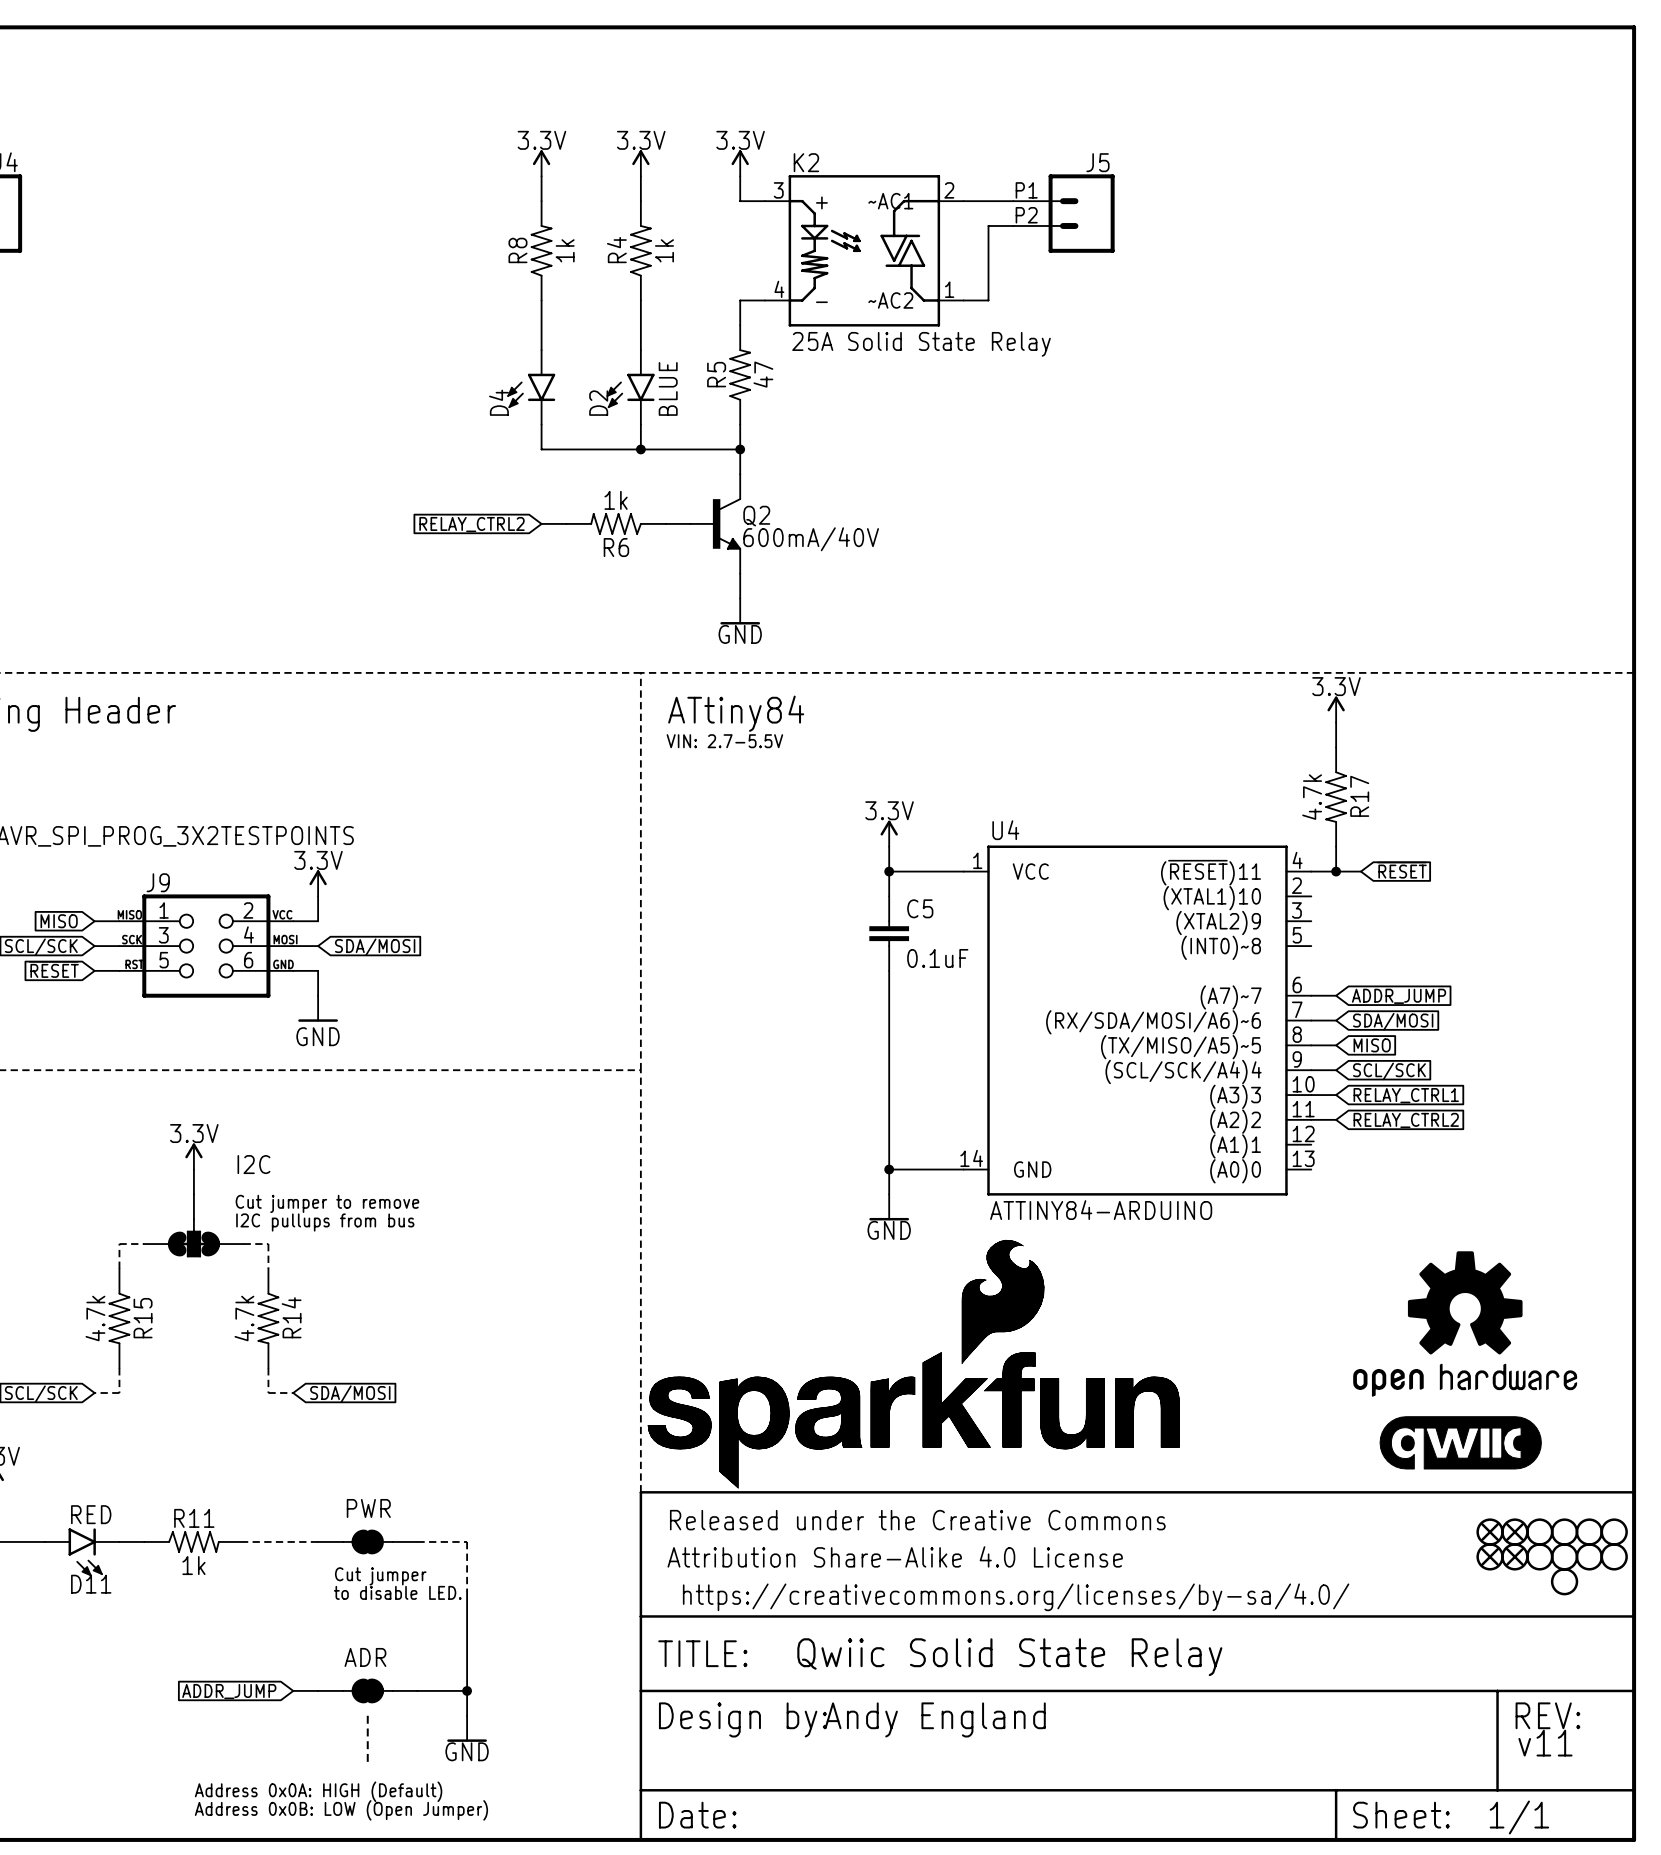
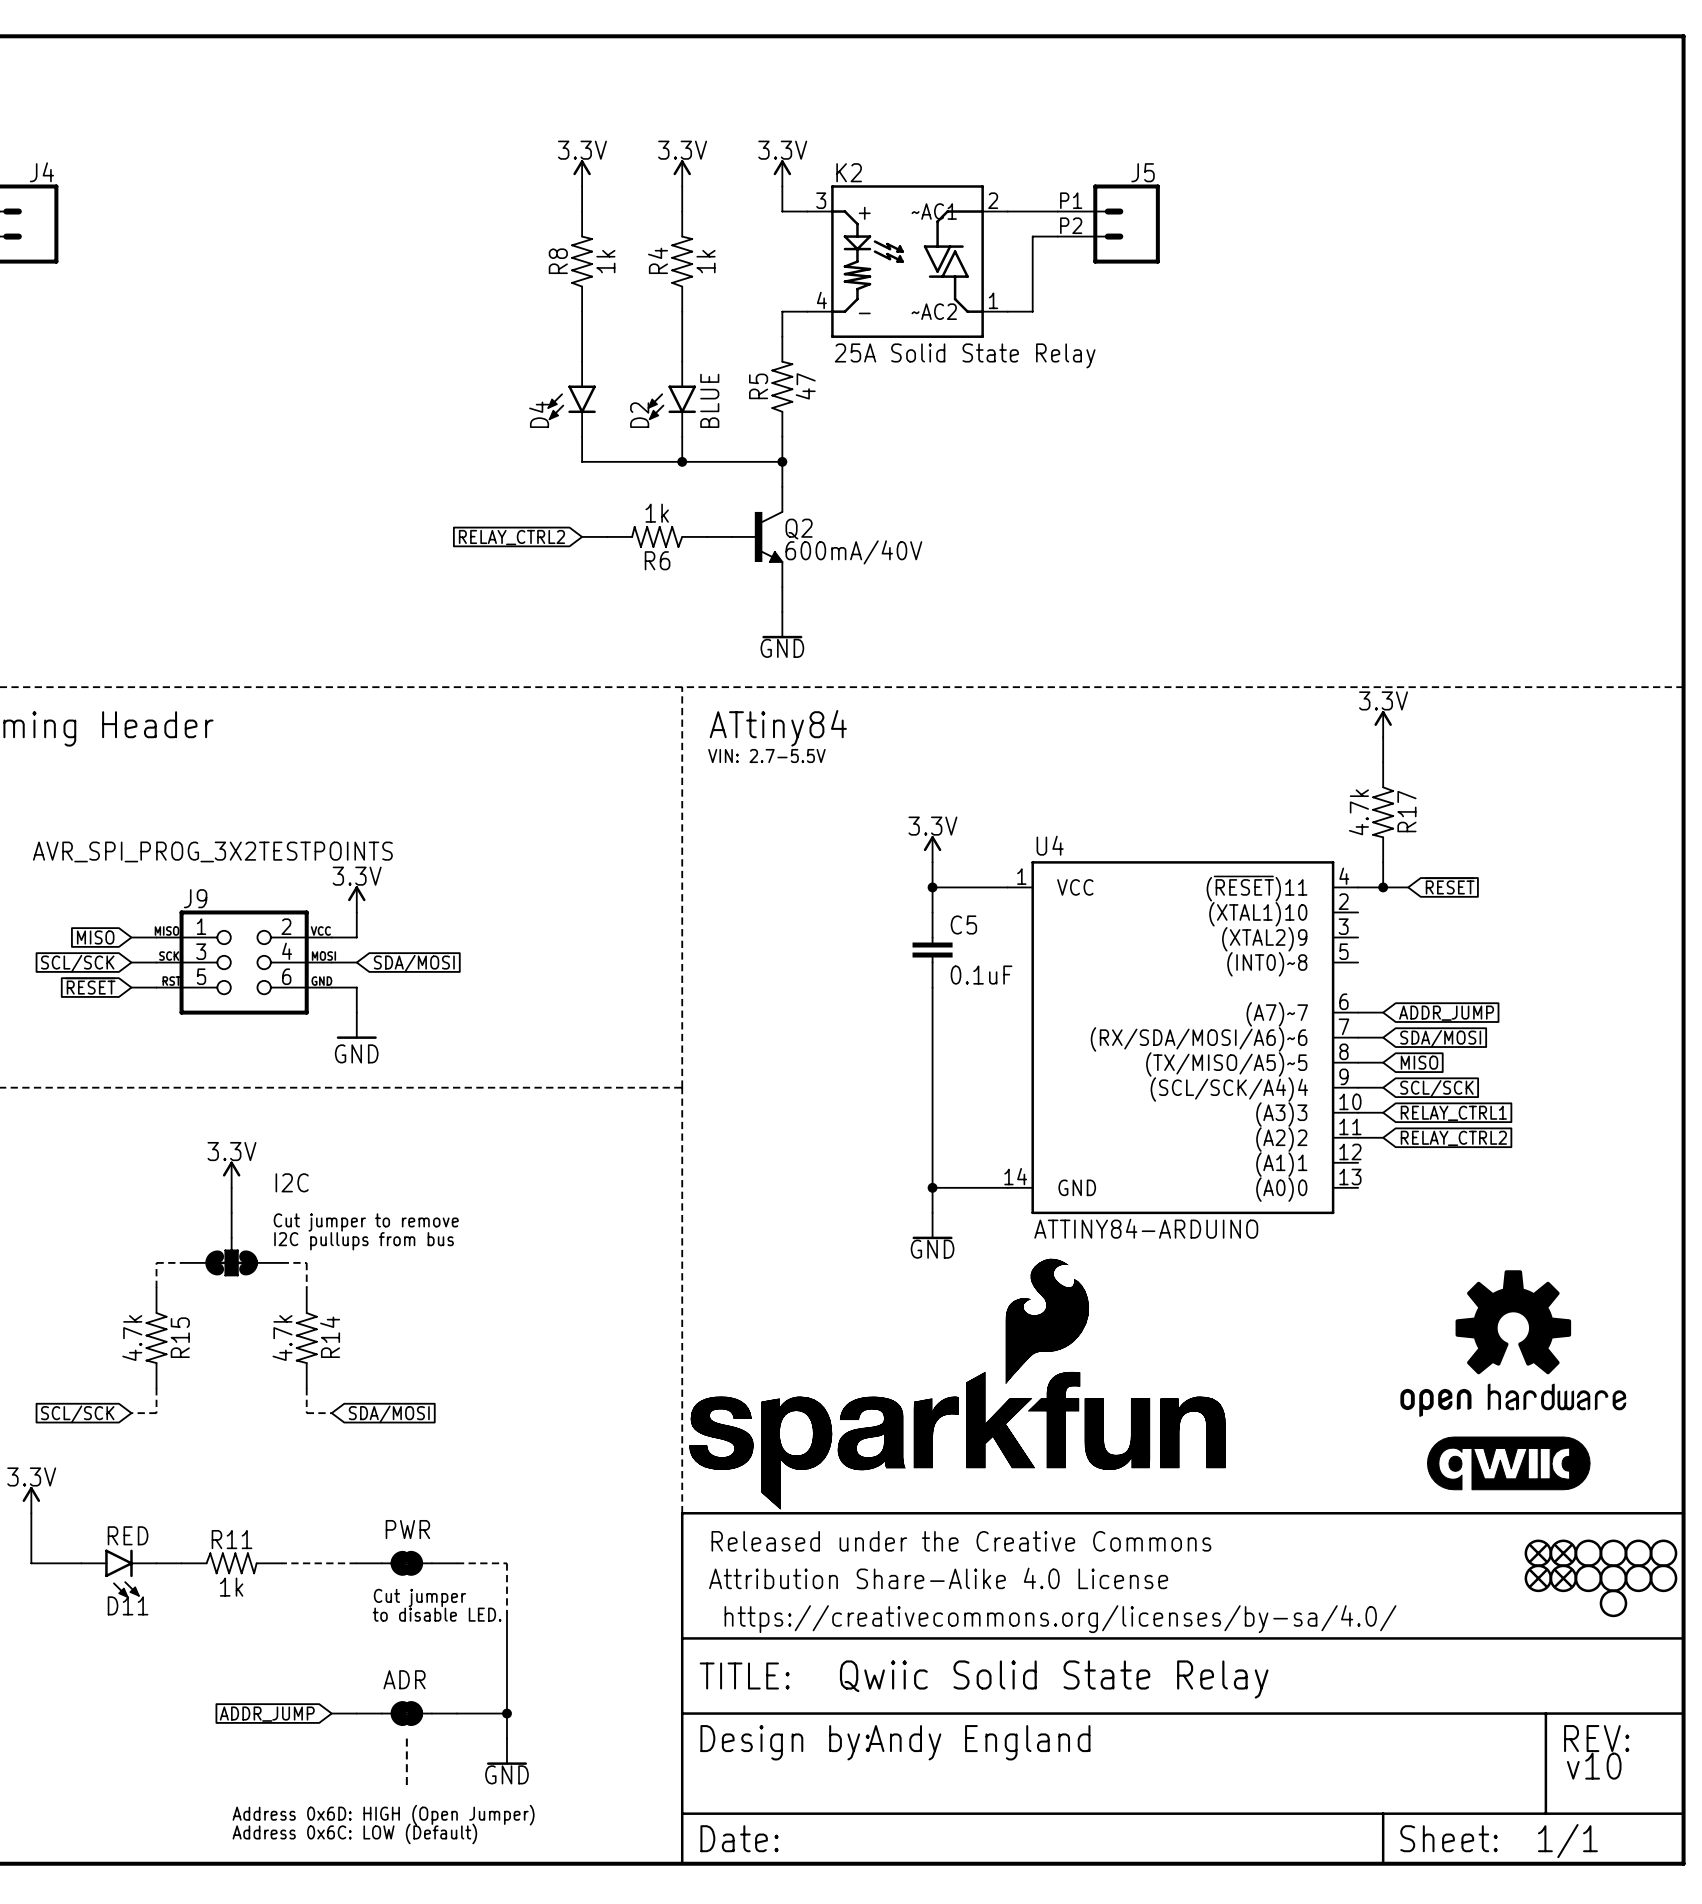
text: v11 (1545, 1743) -> v10 (1594, 1766)
text: Address 0x0A: HIGH (Default) (318, 1791) -> Address 0x6D: HIGH (Open Jumper) (383, 1815)
text: Address 0x0B: LOW (Open Jumper) (341, 1810) -> Address 0x6C: LOW (Default) (354, 1833)

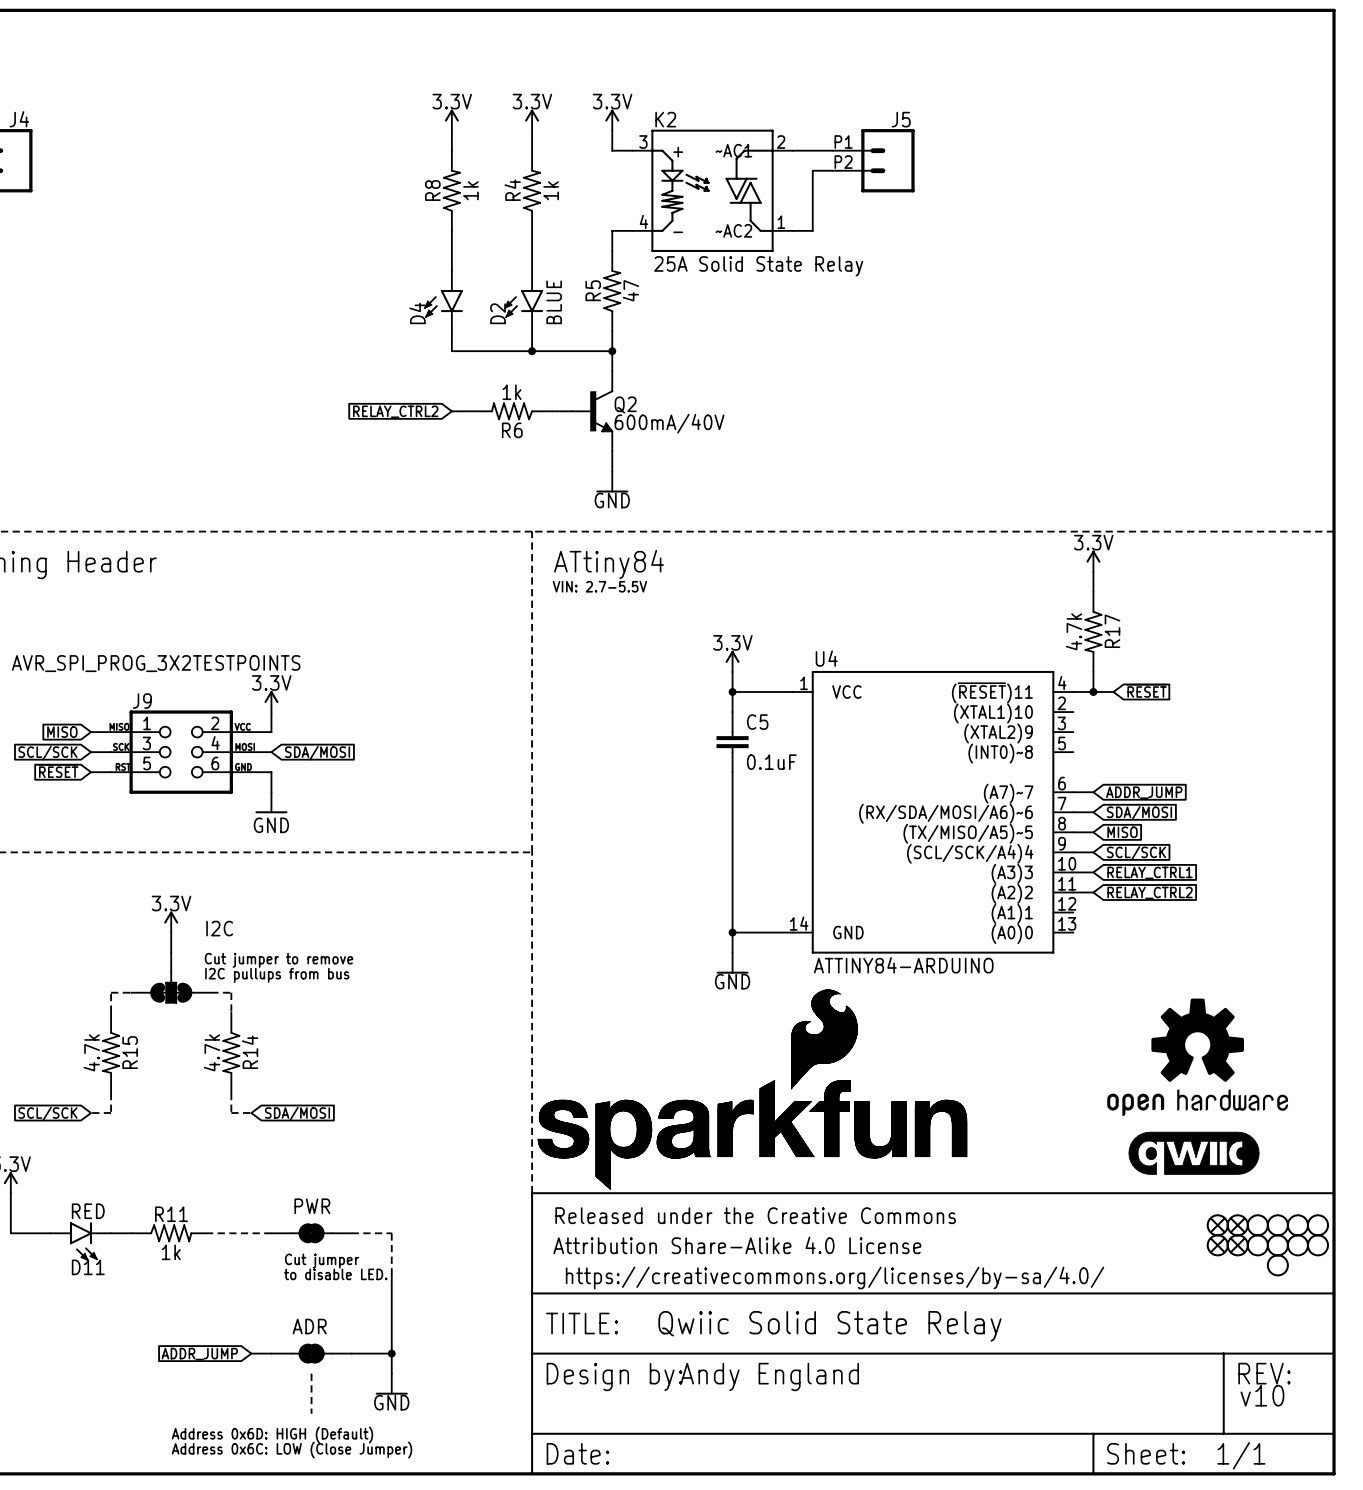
text: Address 0x6D: HIGH (Open Jumper) (383, 1815) -> Address 0x6D: HIGH (Default) (272, 1434)
text: Address 0x6C: LOW (Default) (354, 1833) -> Address 0x6C: LOW (Close Jumper) (292, 1450)

